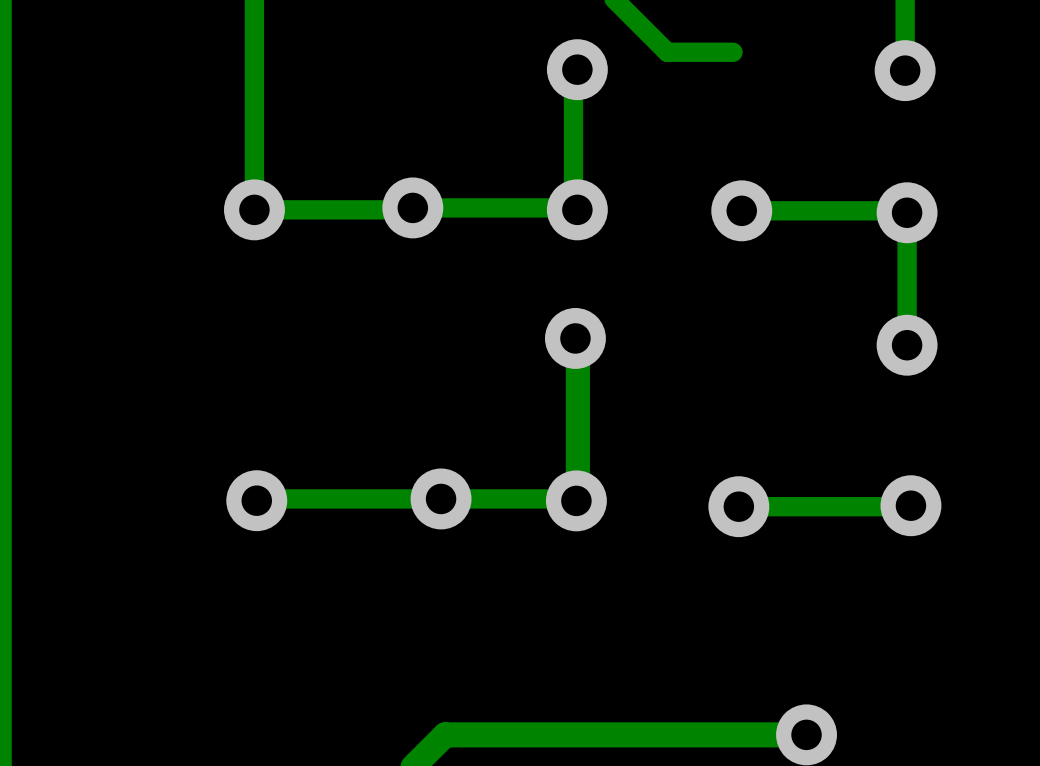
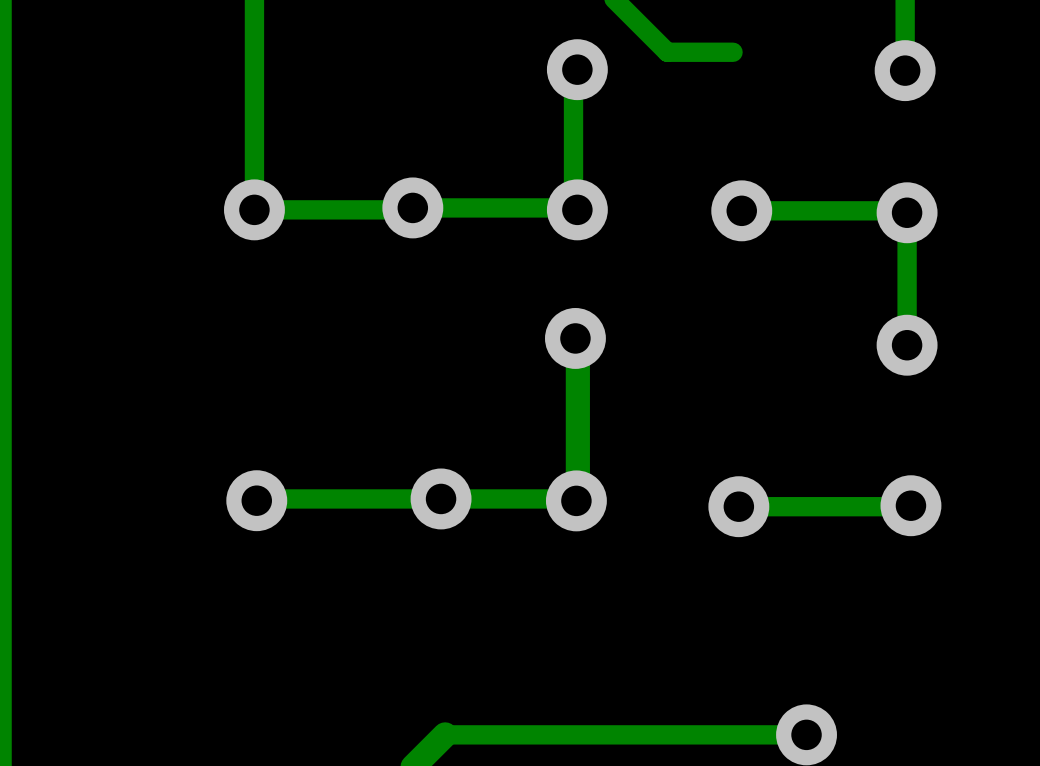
track width: thick (806, 734) (445, 734) -> thin (806, 734) (445, 734)

